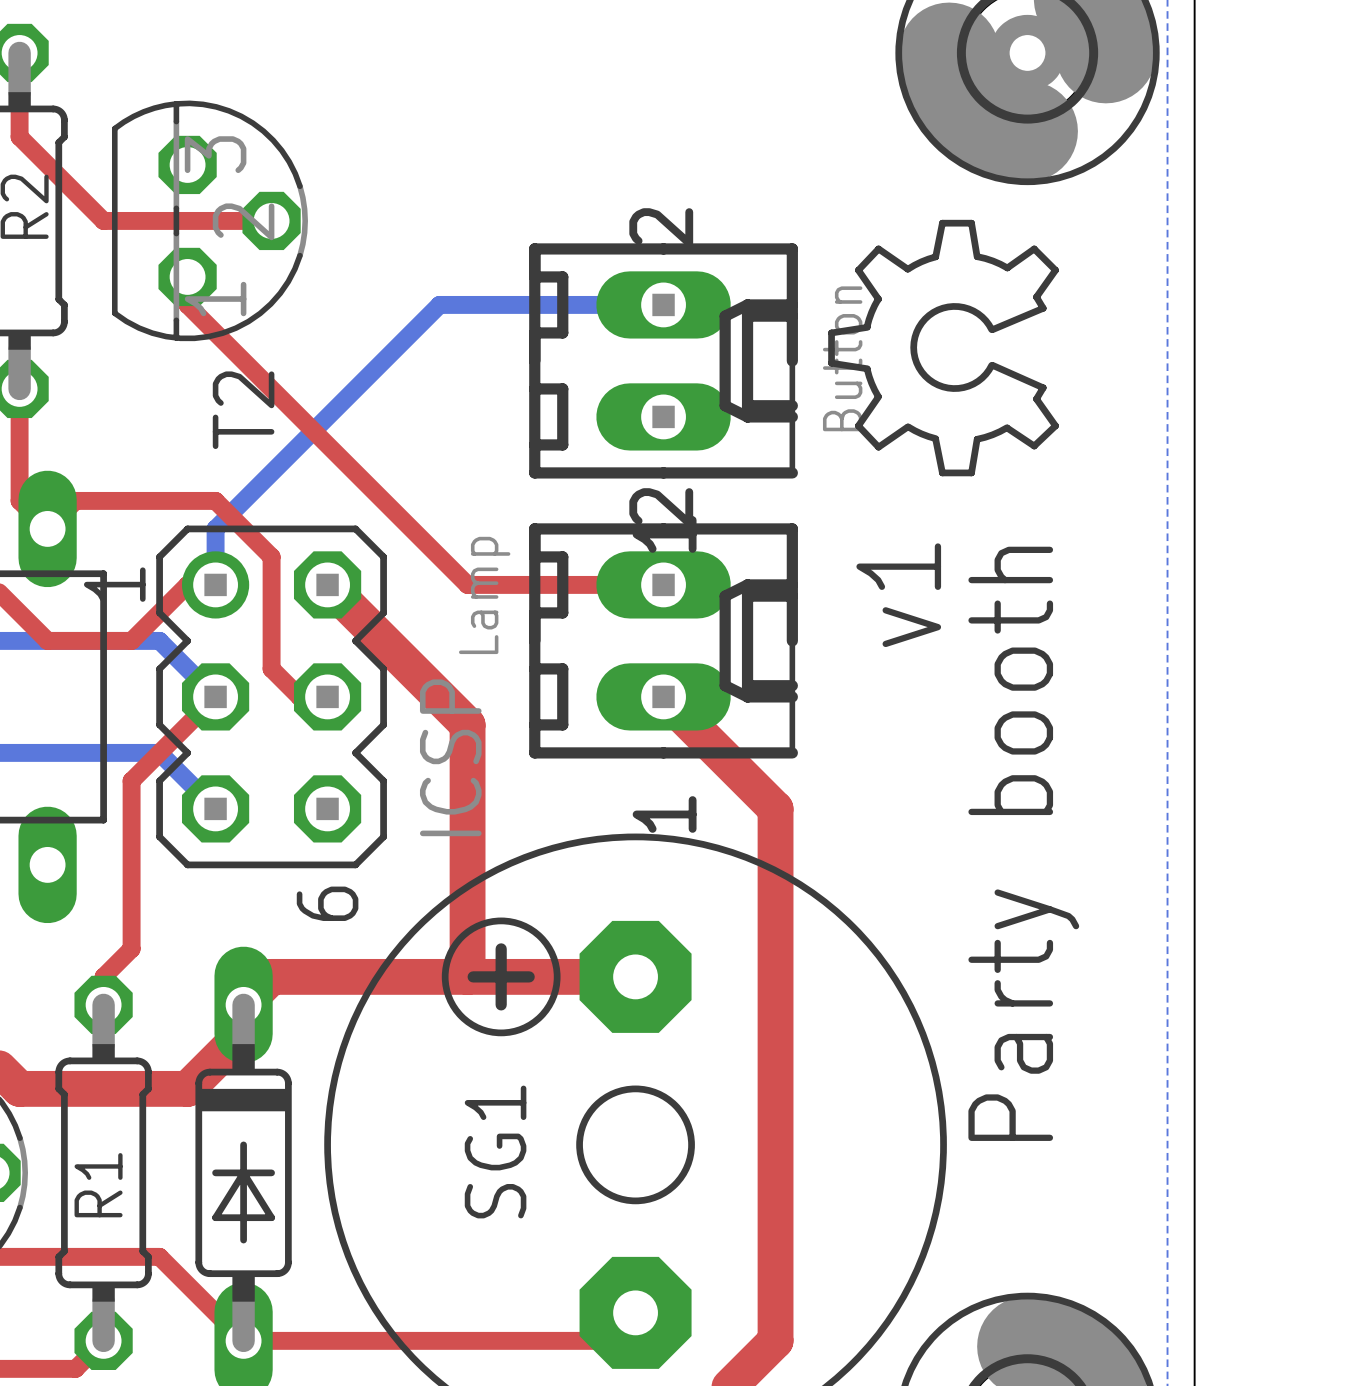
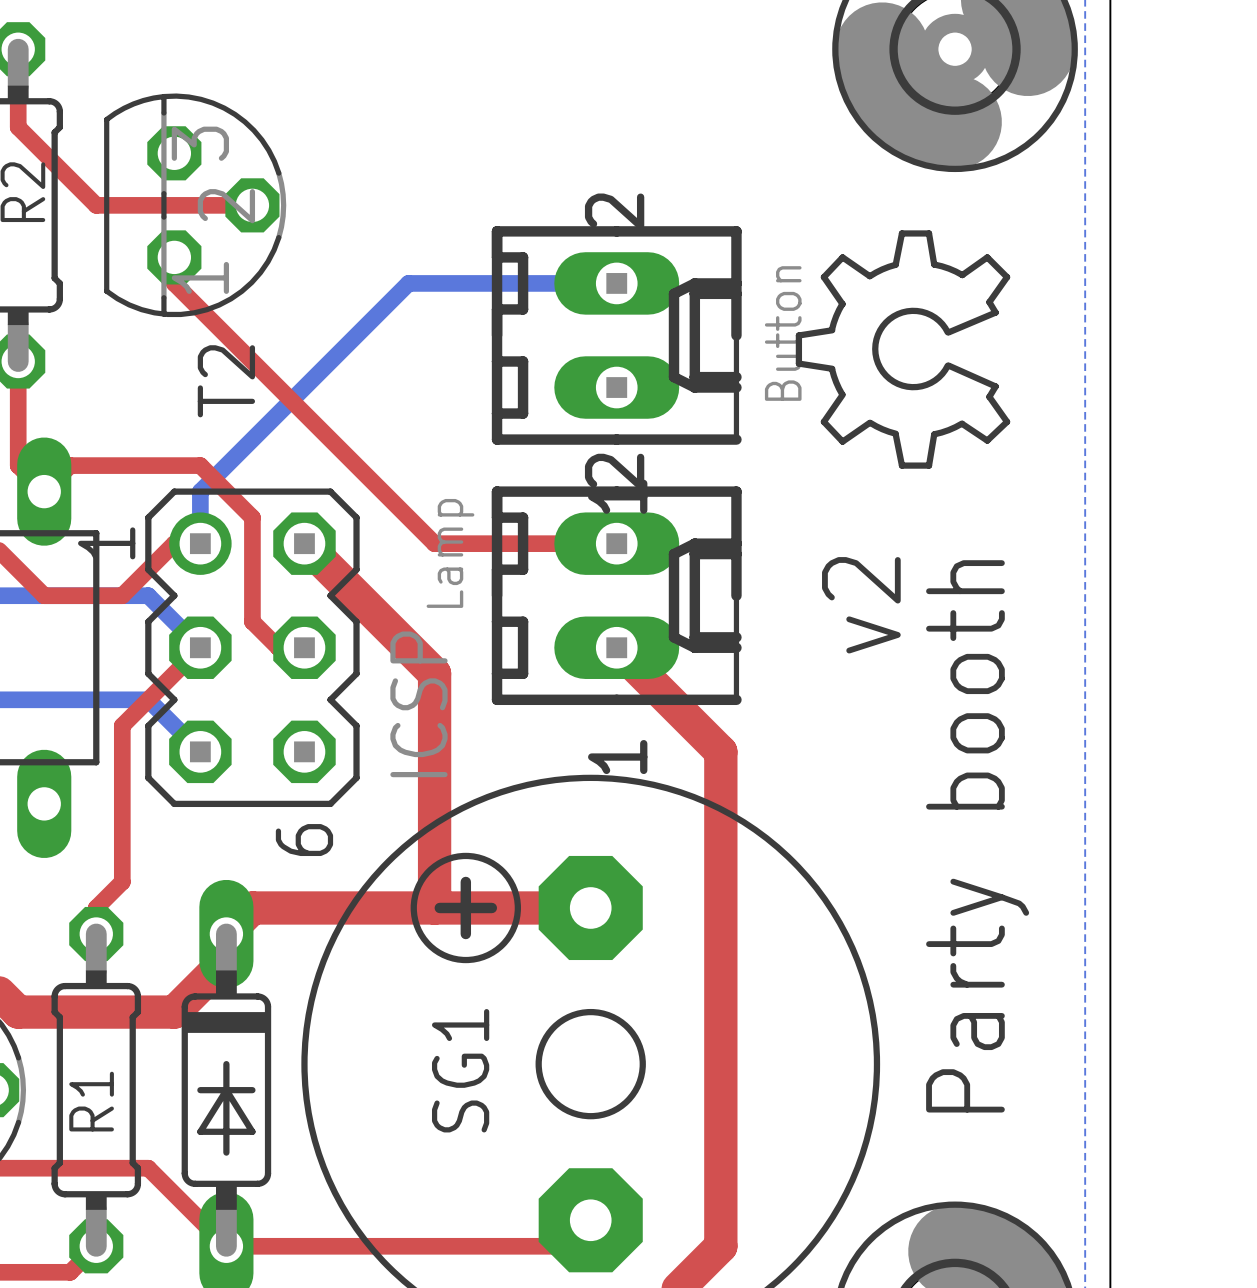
drawing position: (943, 348) -> (903, 349)
text: v1 (898, 595) -> none
text: none -> v2 (861, 605)
text position: Party booth (1023, 843) -> Party booth (977, 836)

